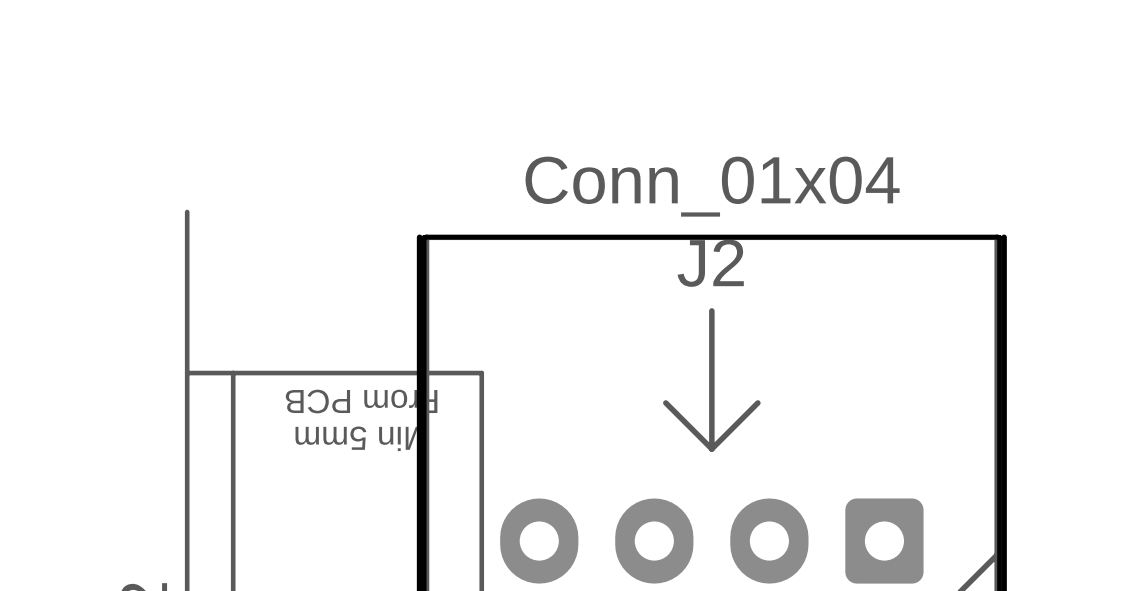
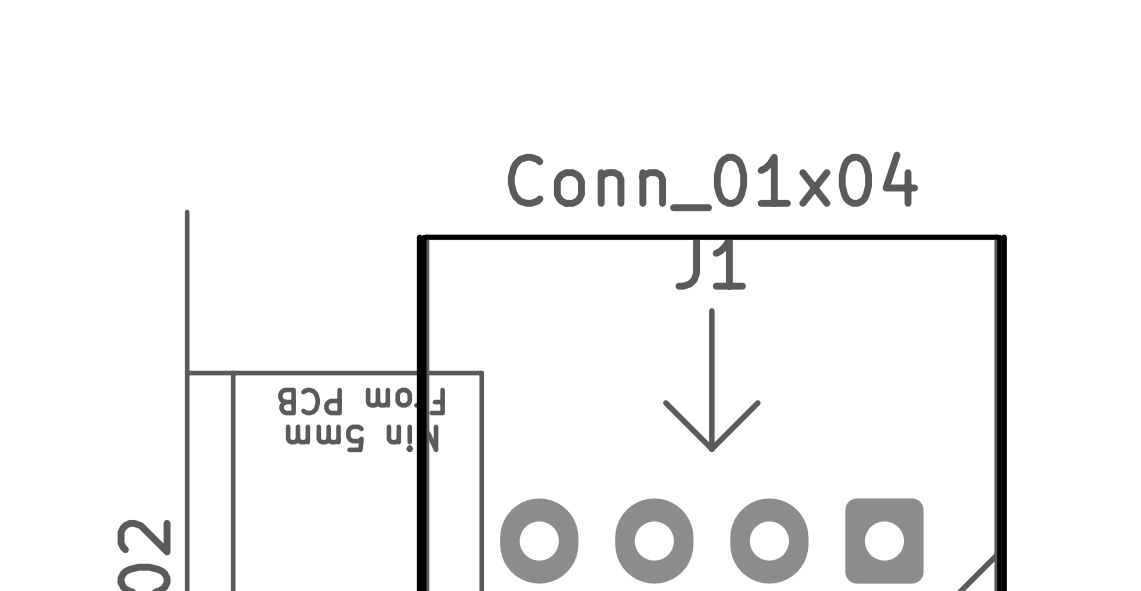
J2 name: J2 (710, 263) -> J1 (710, 263)

